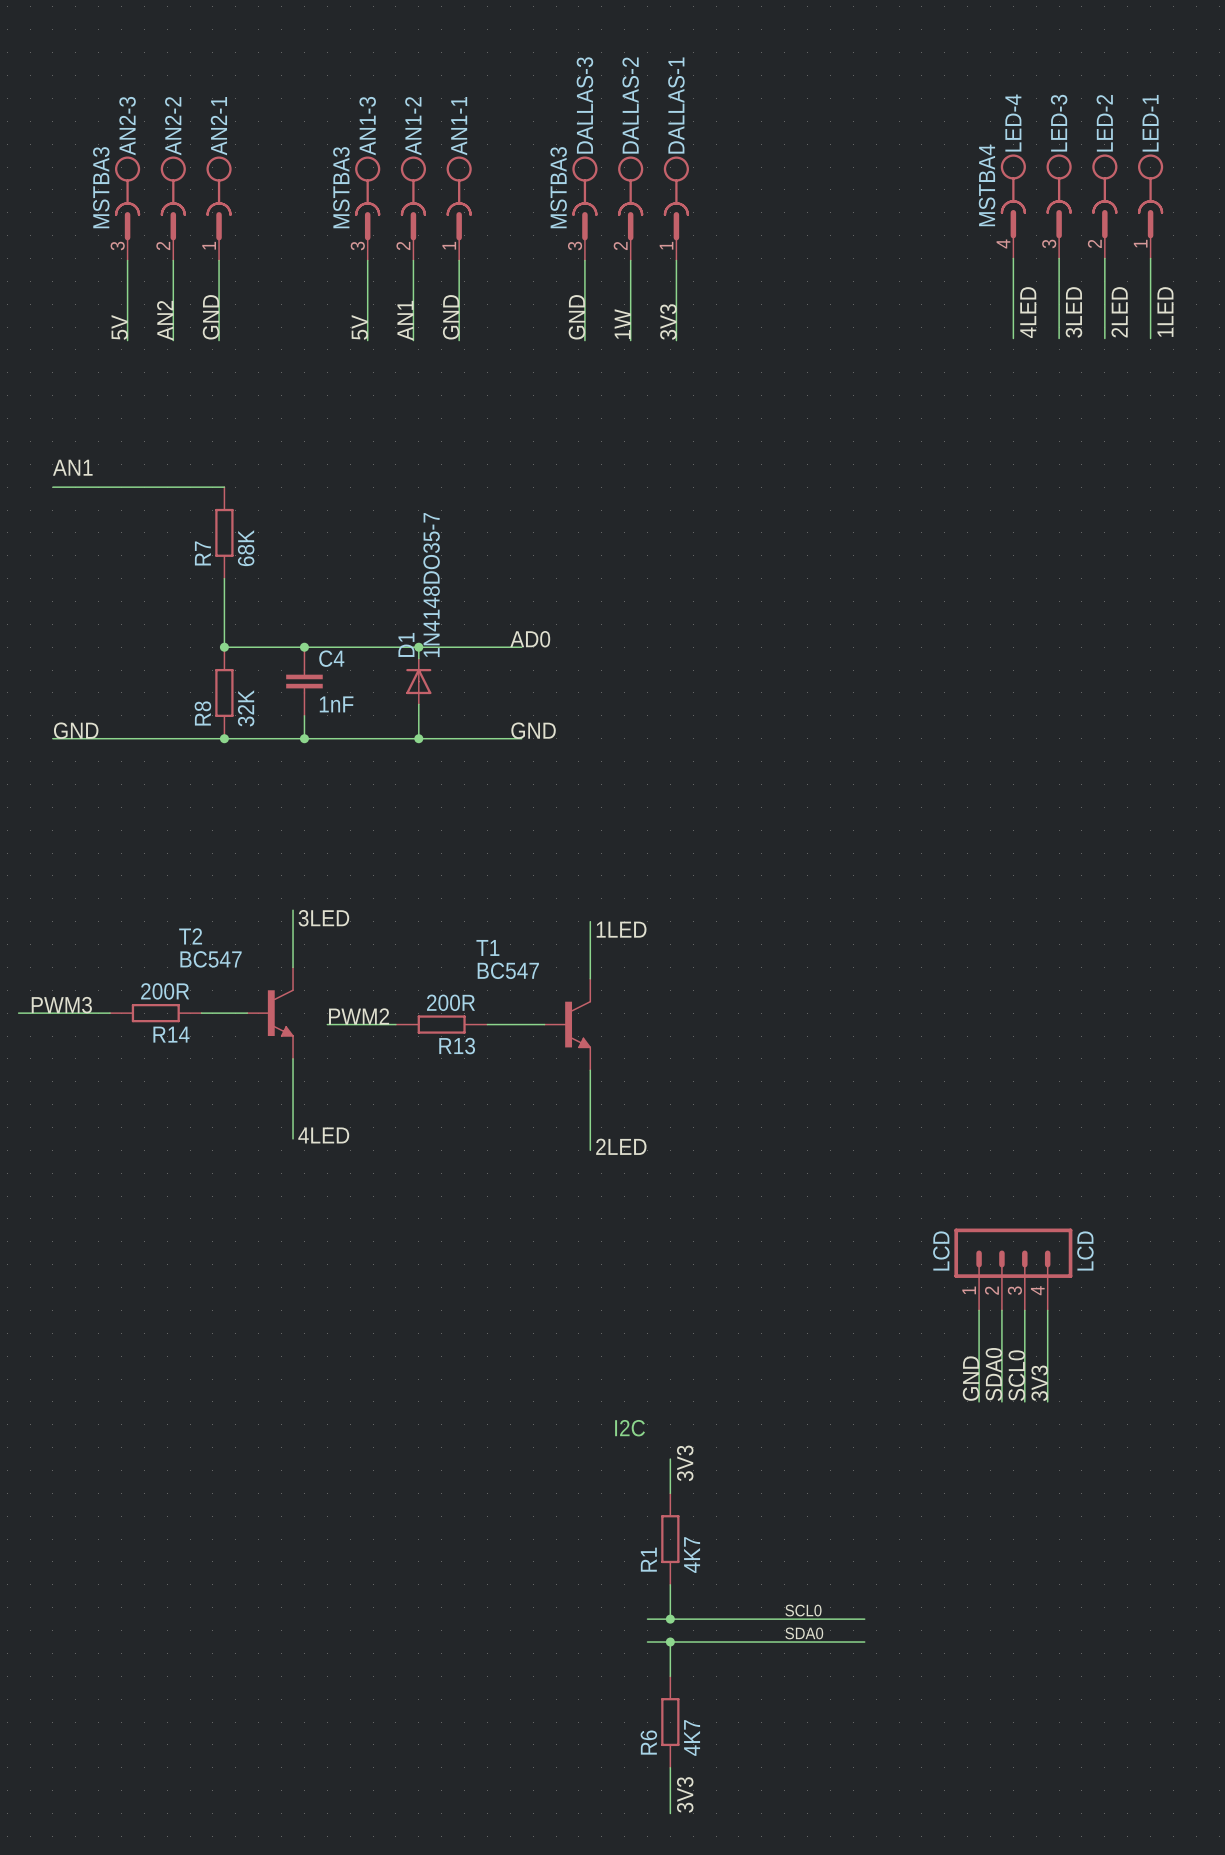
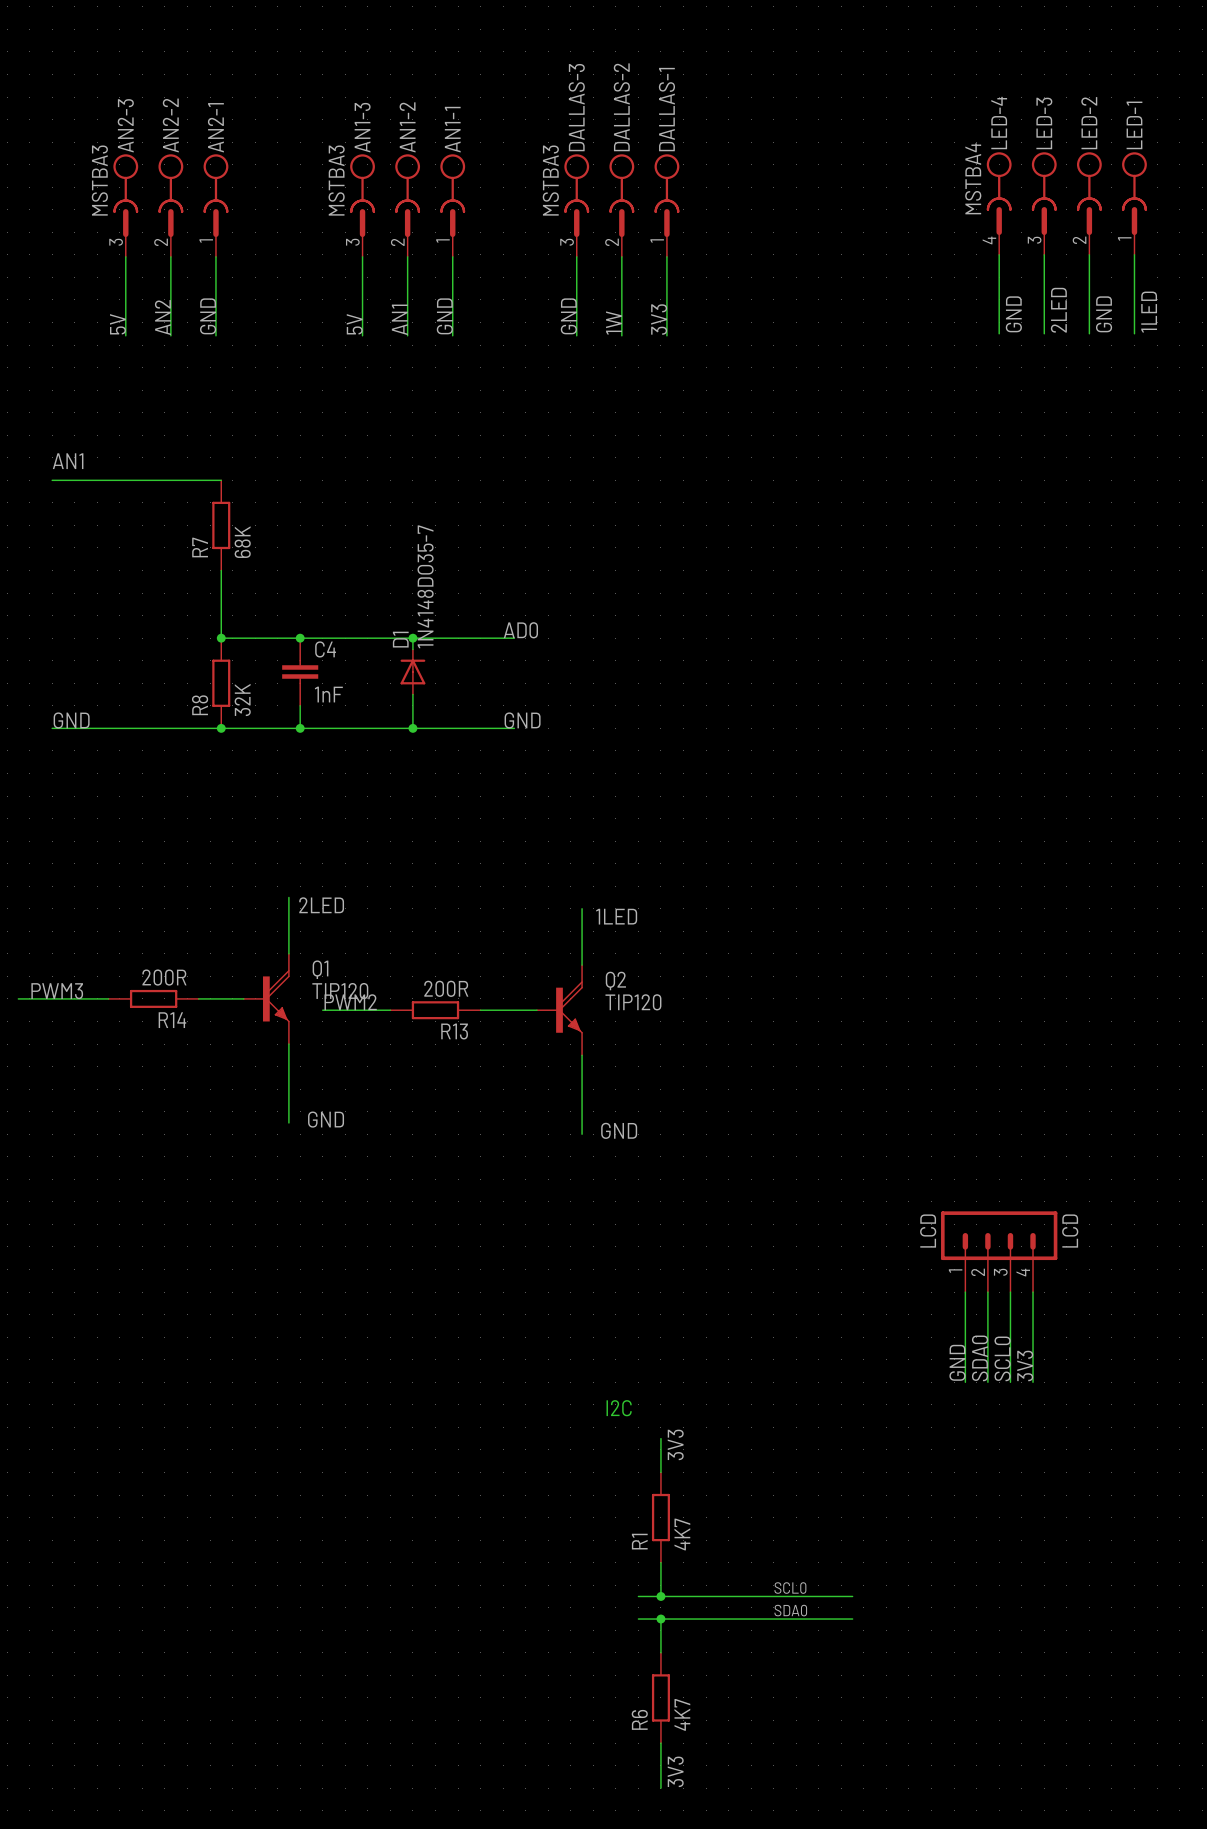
label: 4LED (1028, 312) -> GND (1013, 314)
label: 3LED (1073, 312) -> 2LED (1058, 310)
label: 2LED (1119, 312) -> GND (1104, 314)
label: 3LED (323, 918) -> 2LED (321, 905)
T2: BC547 (270, 1013) -> none
Q1: none -> TIP120 (266, 998)
T1: BC547 (567, 1024) -> none
Q2: none -> TIP120 (559, 1010)
label: 4LED (323, 1135) -> GND (326, 1119)
label: 2LED (621, 1146) -> GND (619, 1130)

